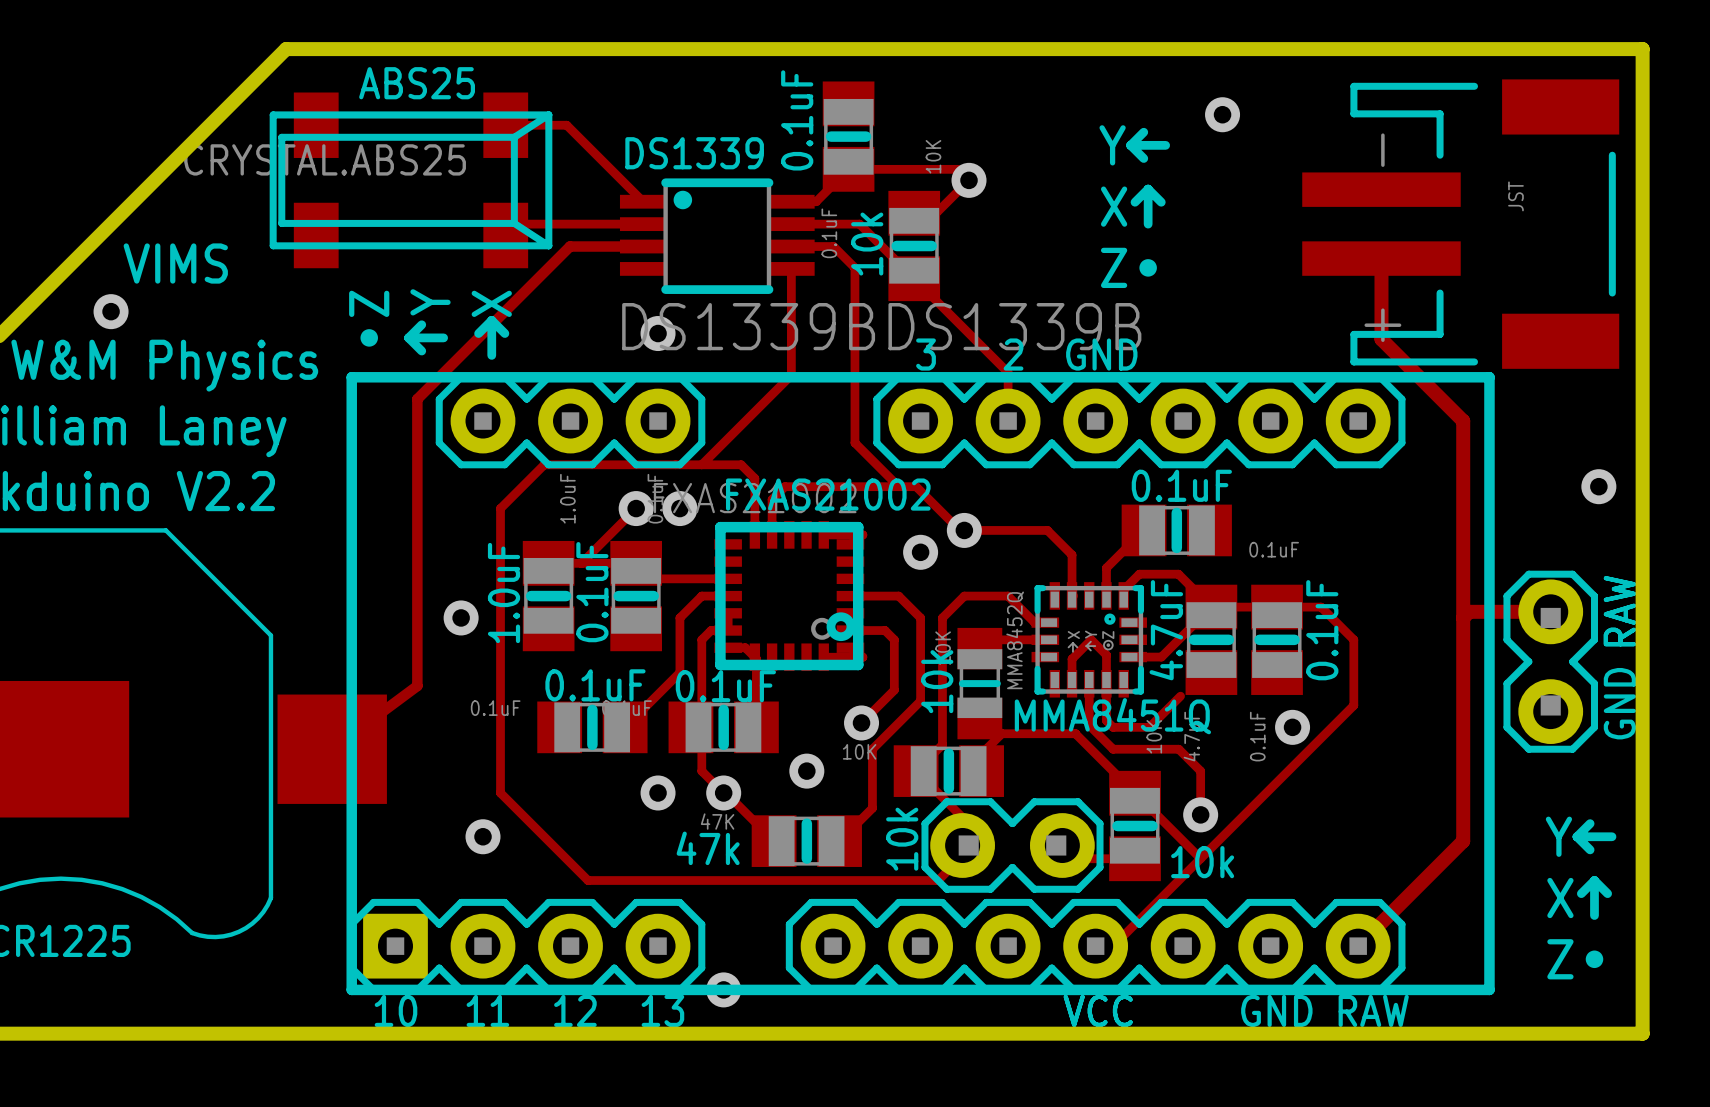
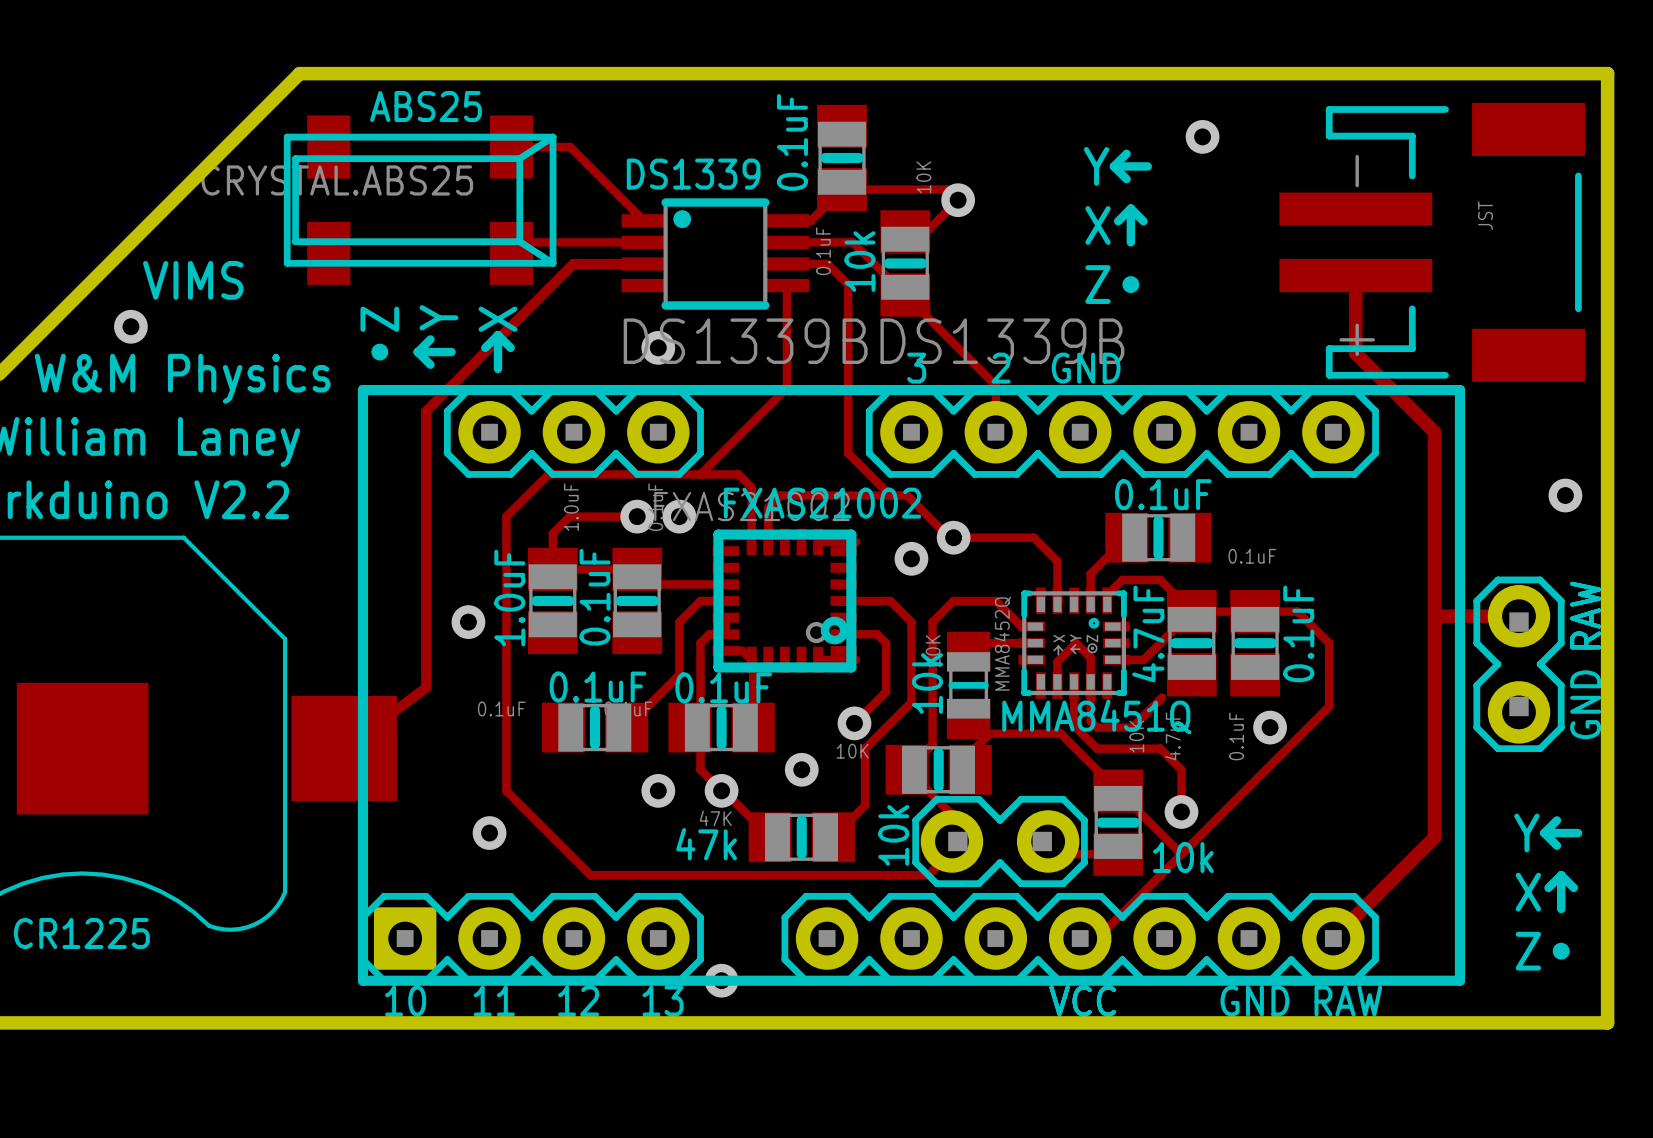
track: (636, 508) (581, 563) -> (637, 516) (569, 516) (552, 533) (552, 569)

